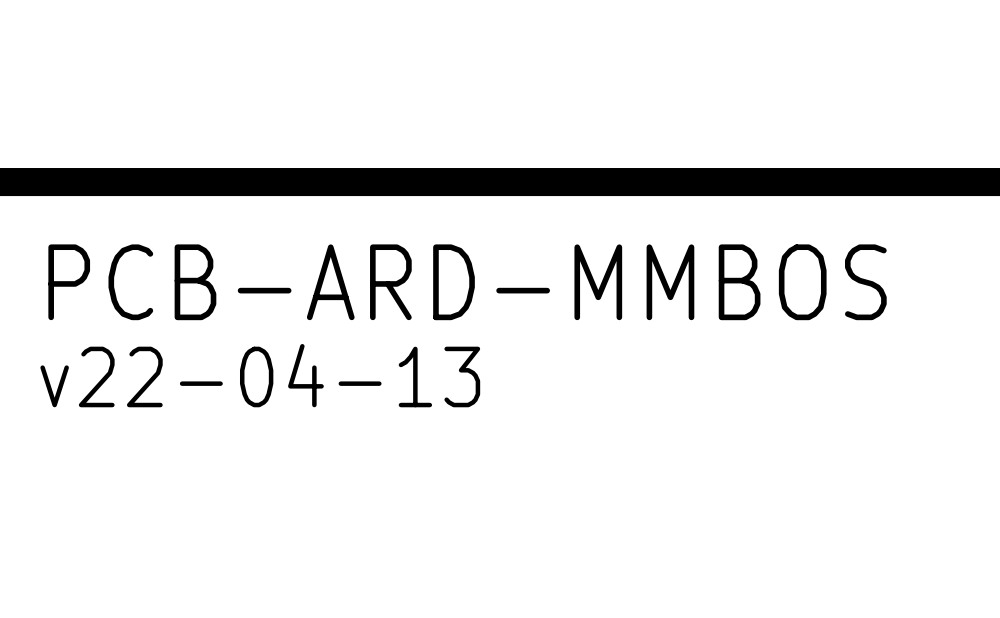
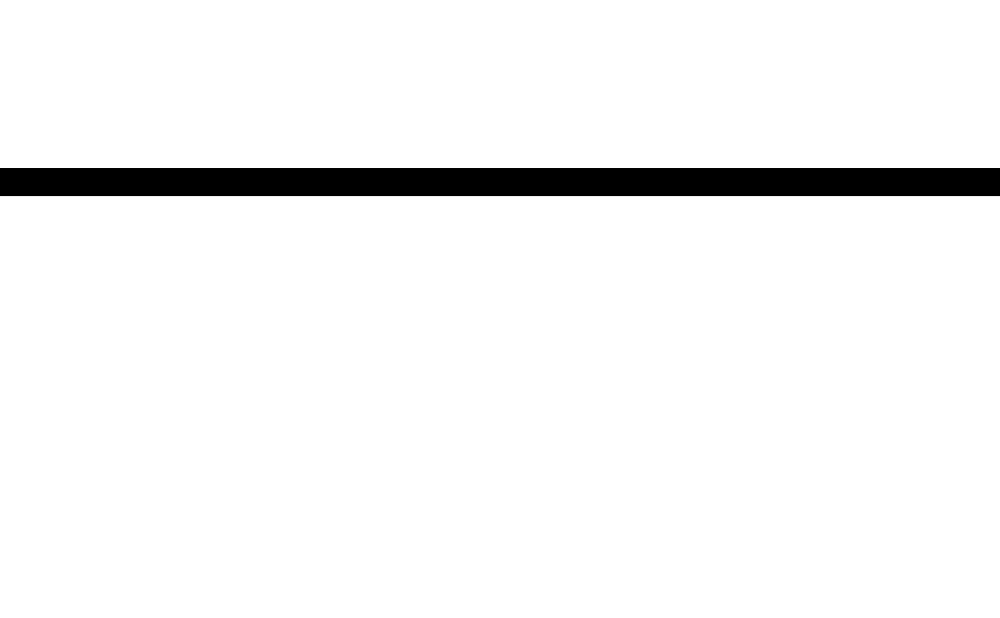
text: PCB-ARD-MMBOS (467, 282) -> none
text: v22-04-13 (260, 375) -> none

